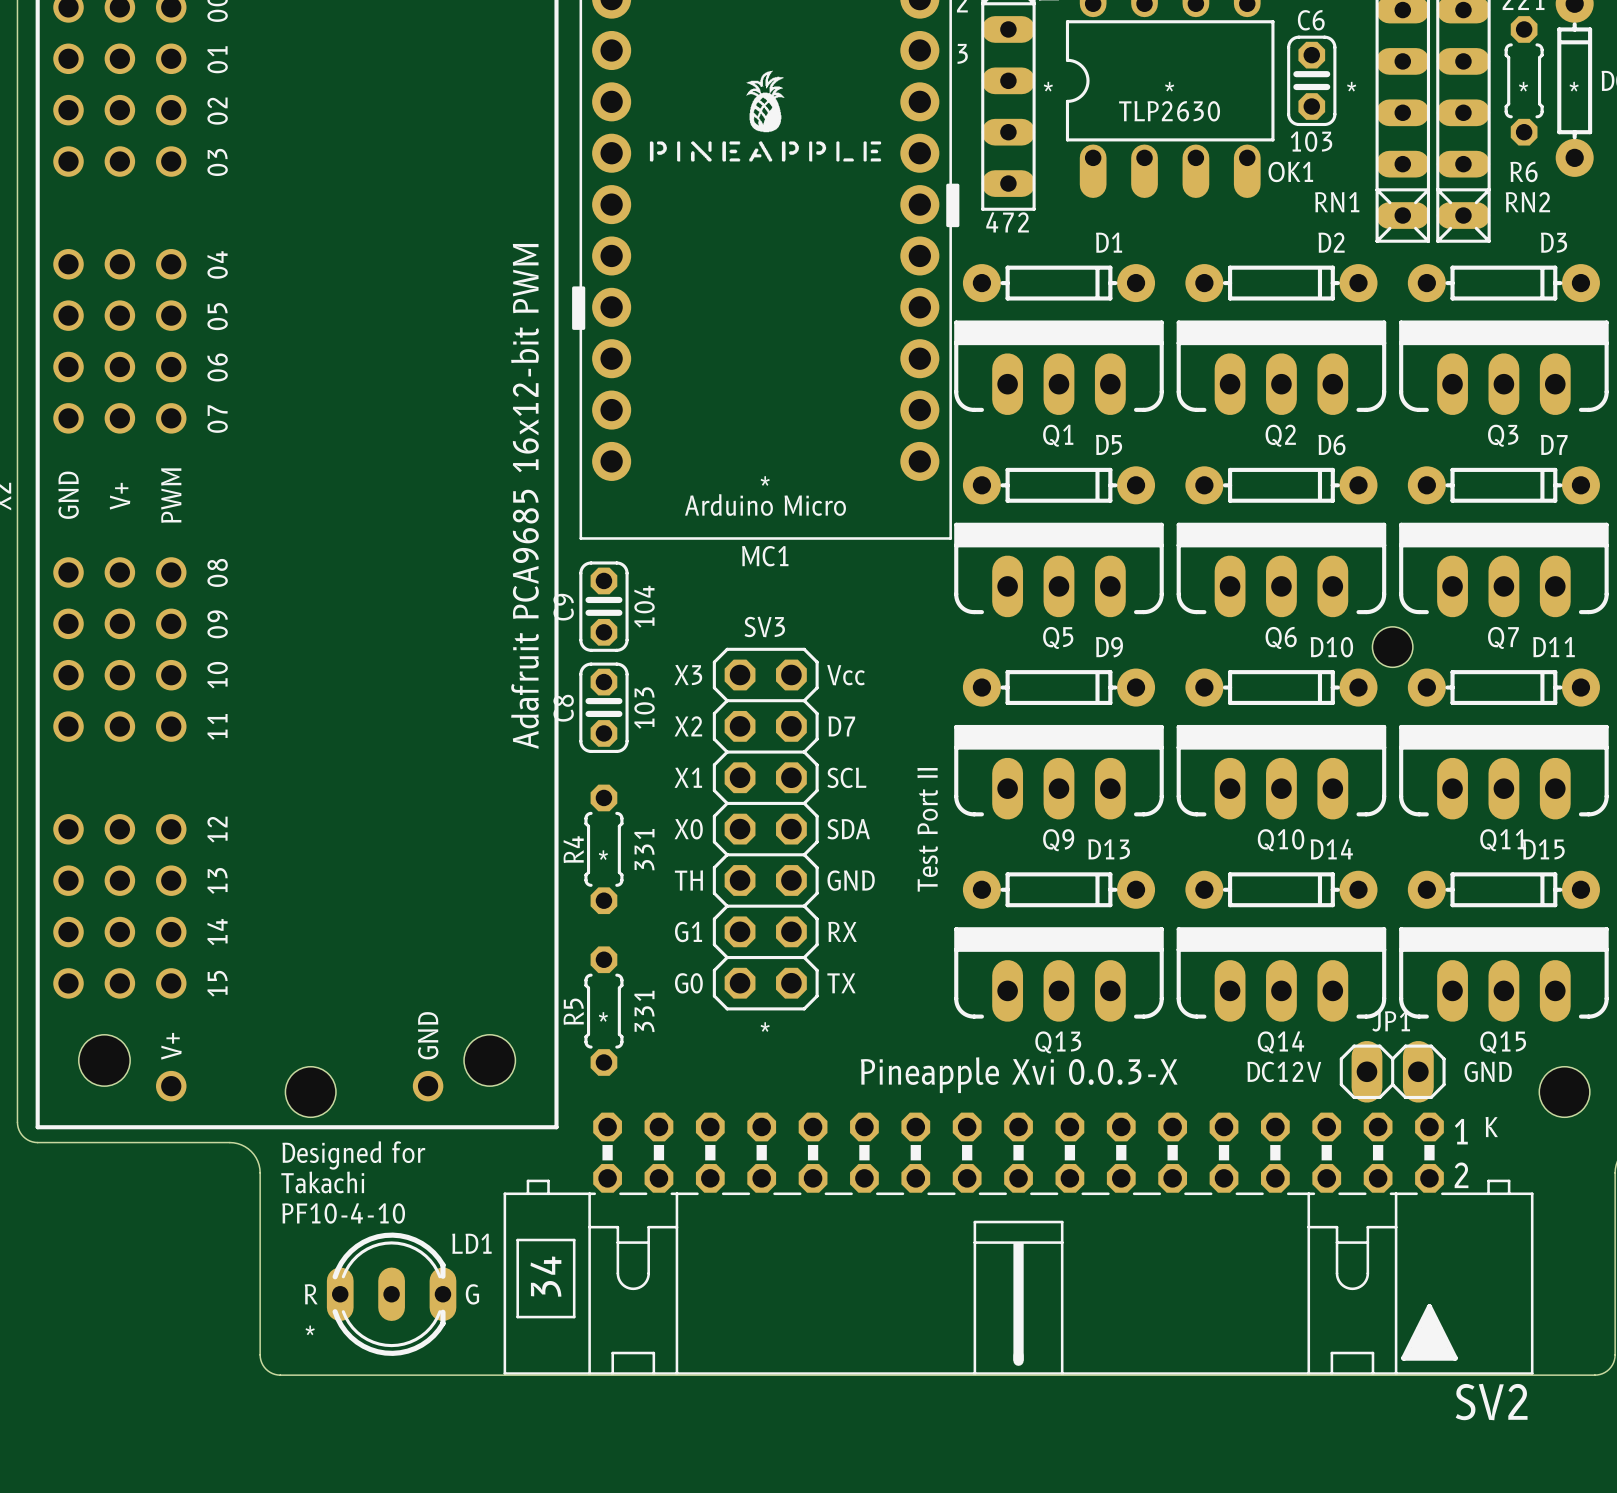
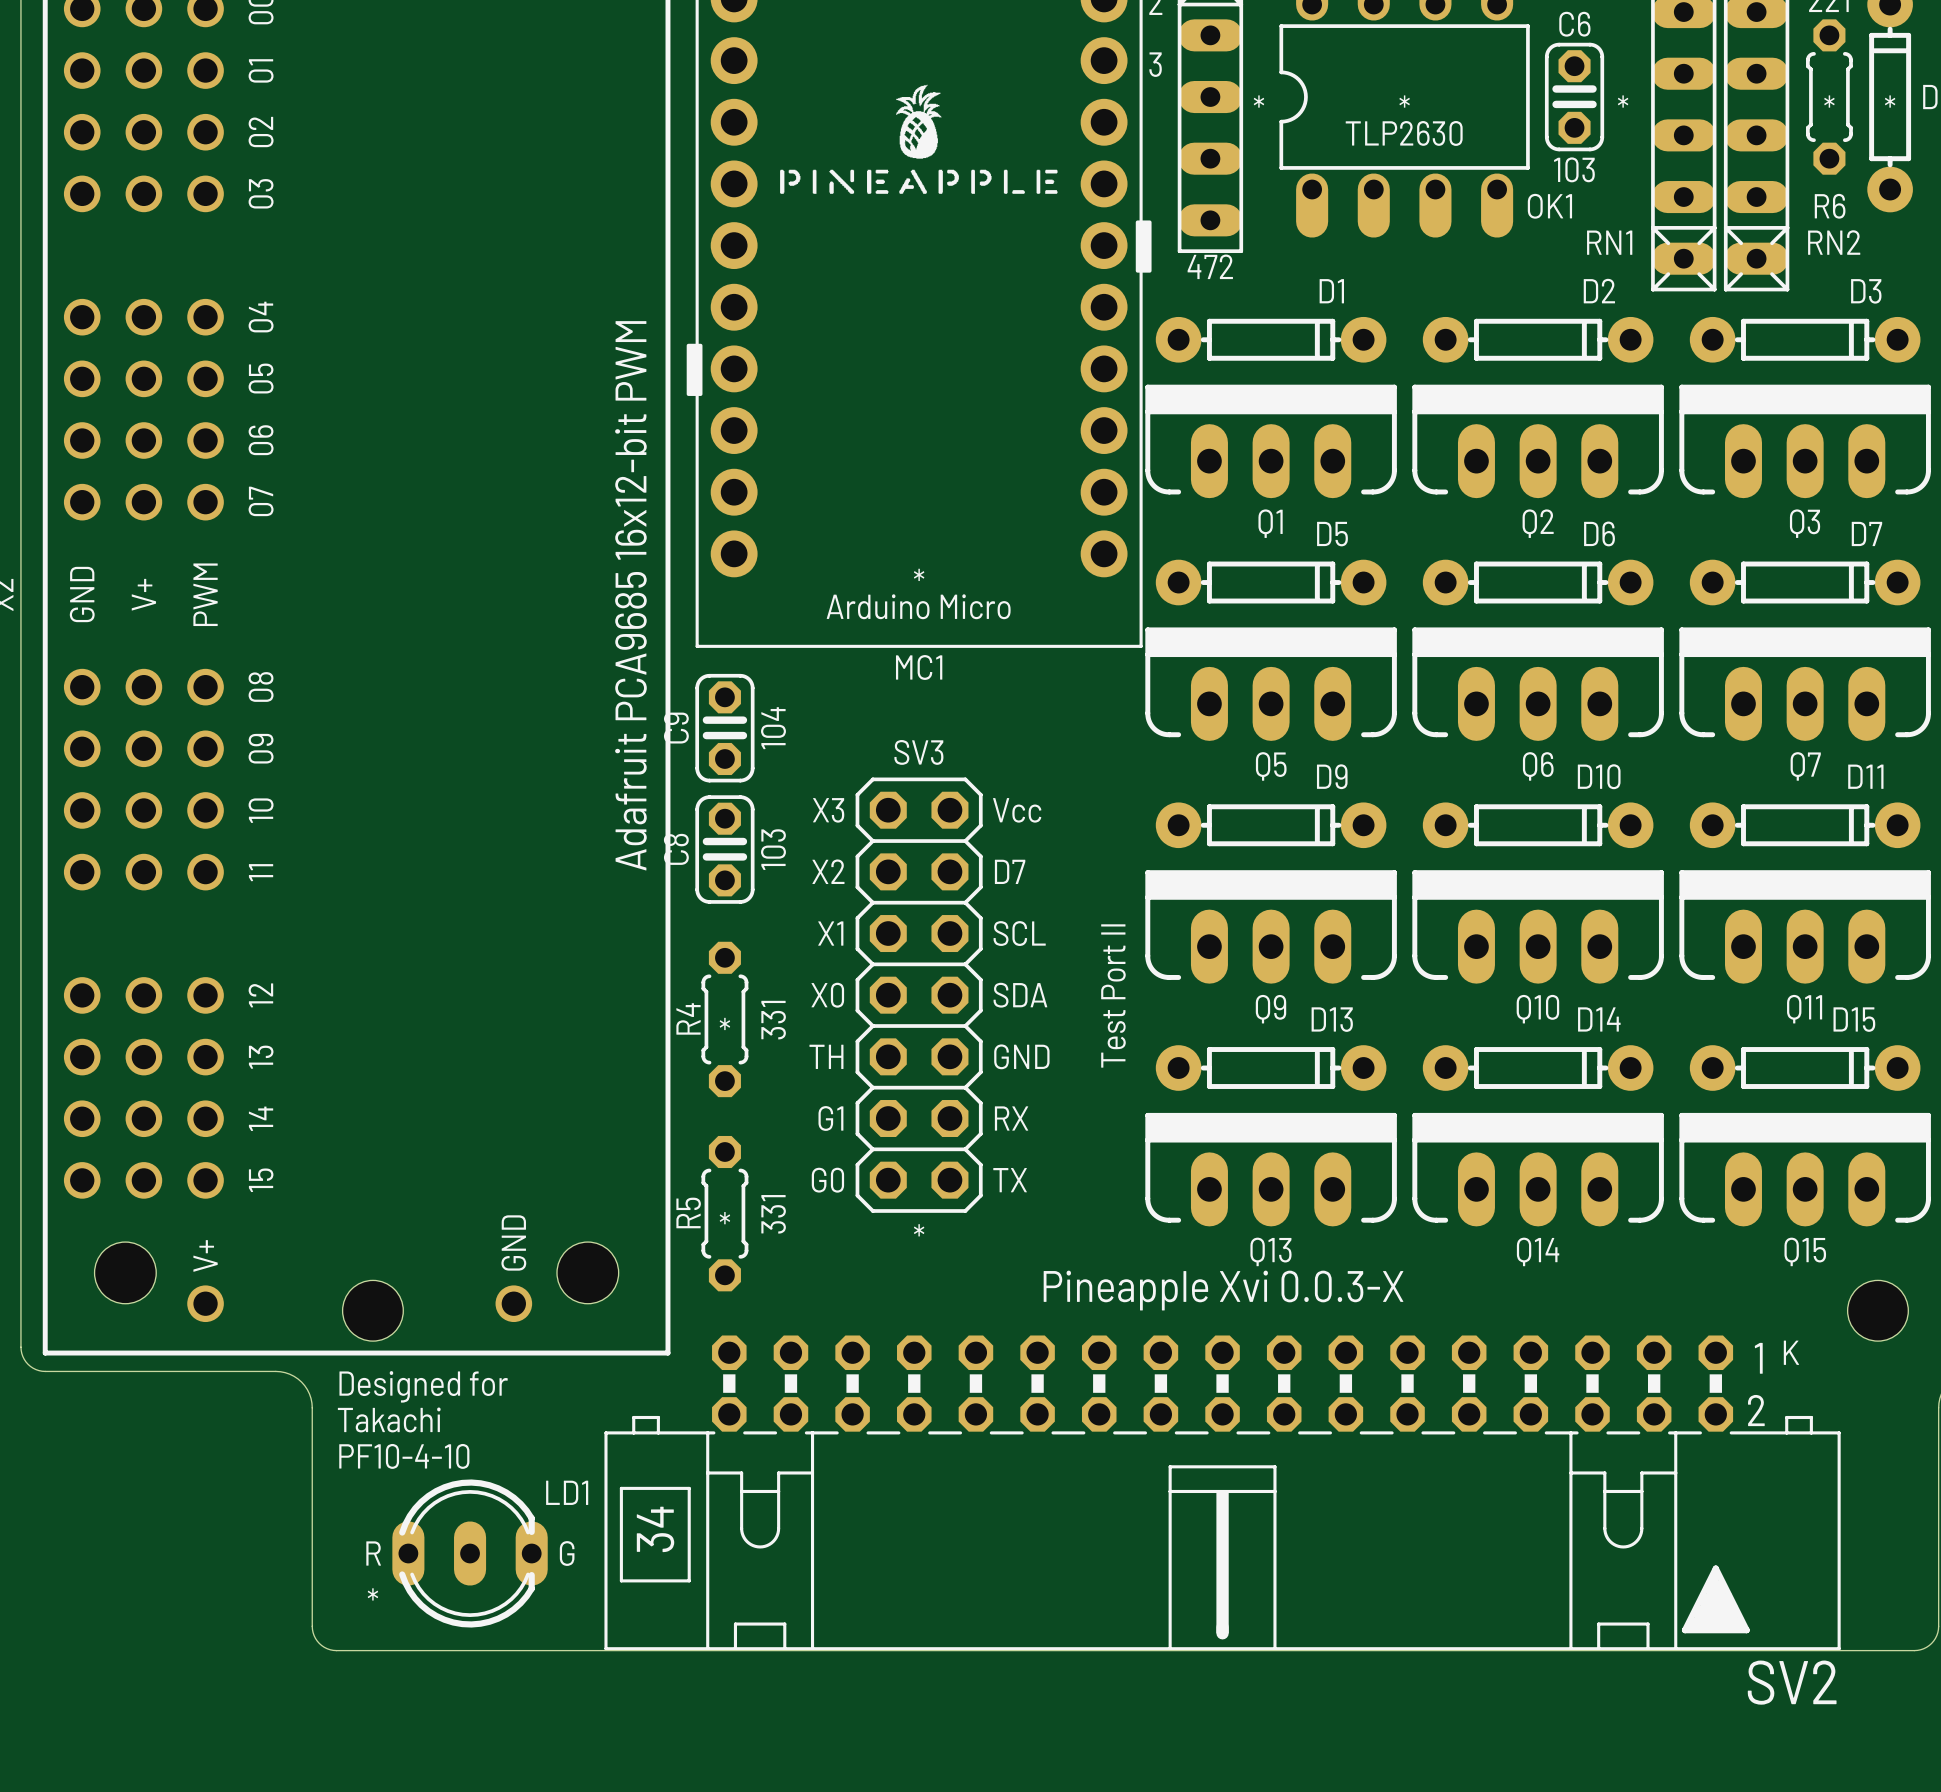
hole: (1392, 647) -> none
text: DC12V (1284, 1071) -> none
JP1: (1392, 1071) -> none
text: GND (1488, 1071) -> none

